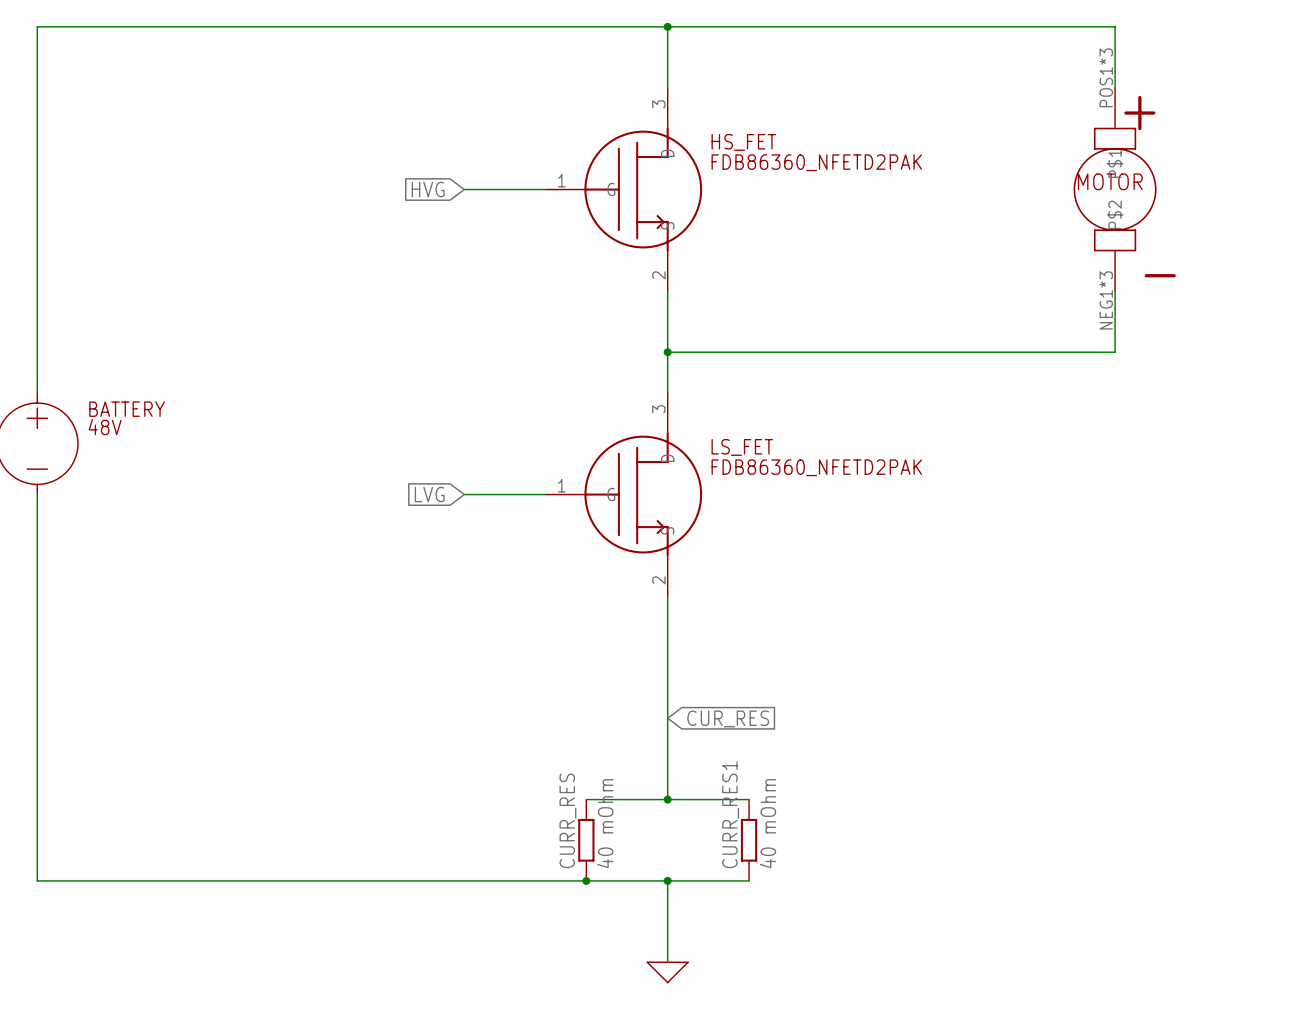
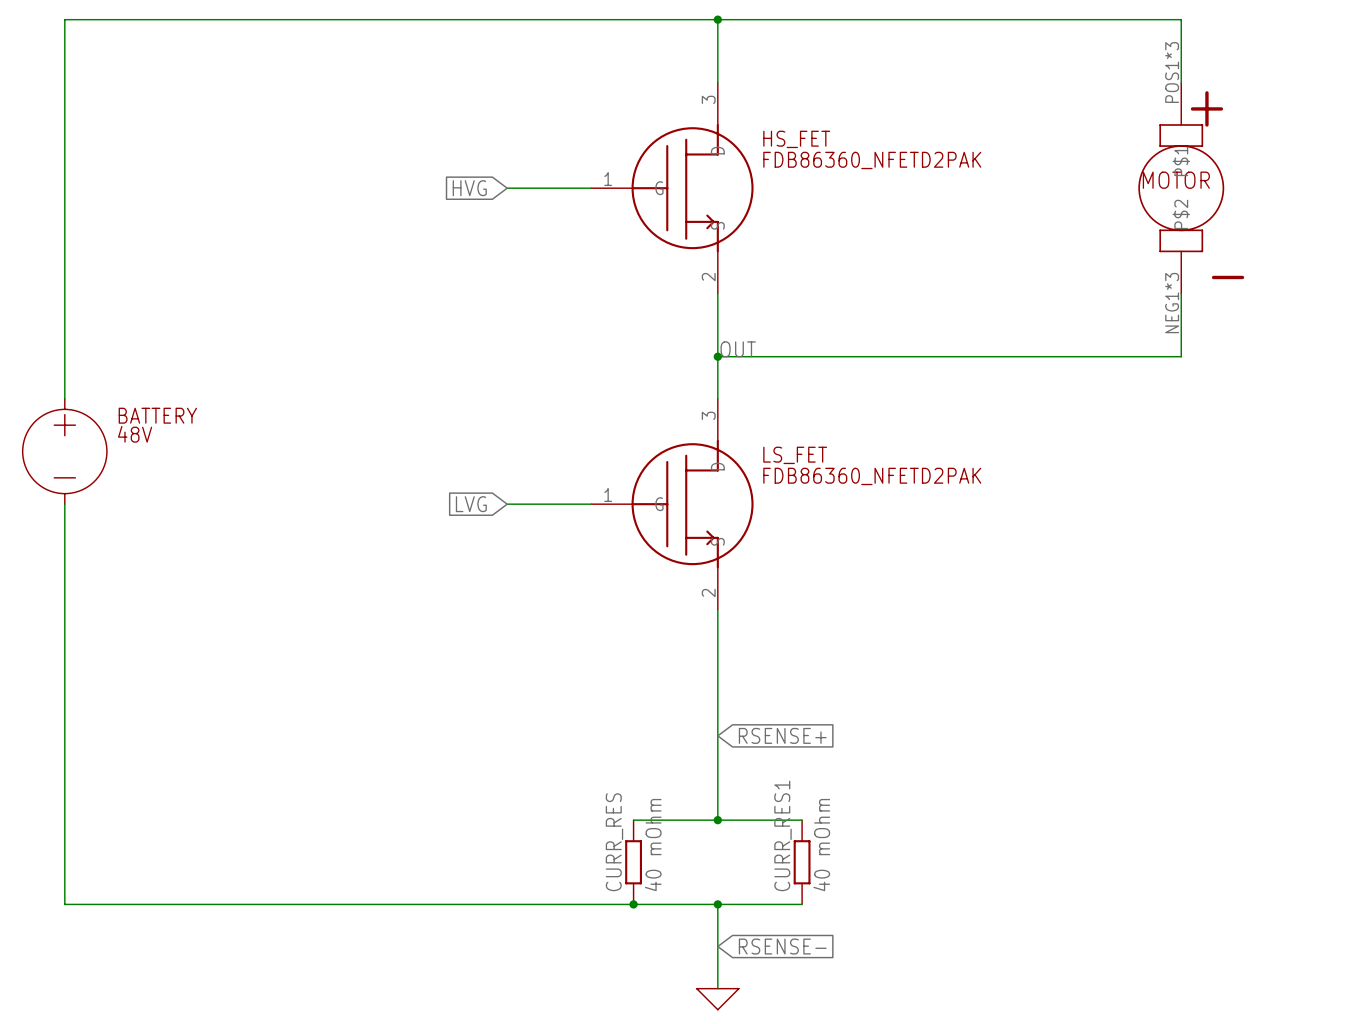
label: none -> OUT (738, 349)
global label: CUR_RES (728, 718) -> RSENSE+ (782, 735)
global label: none -> RSENSE- (782, 946)

